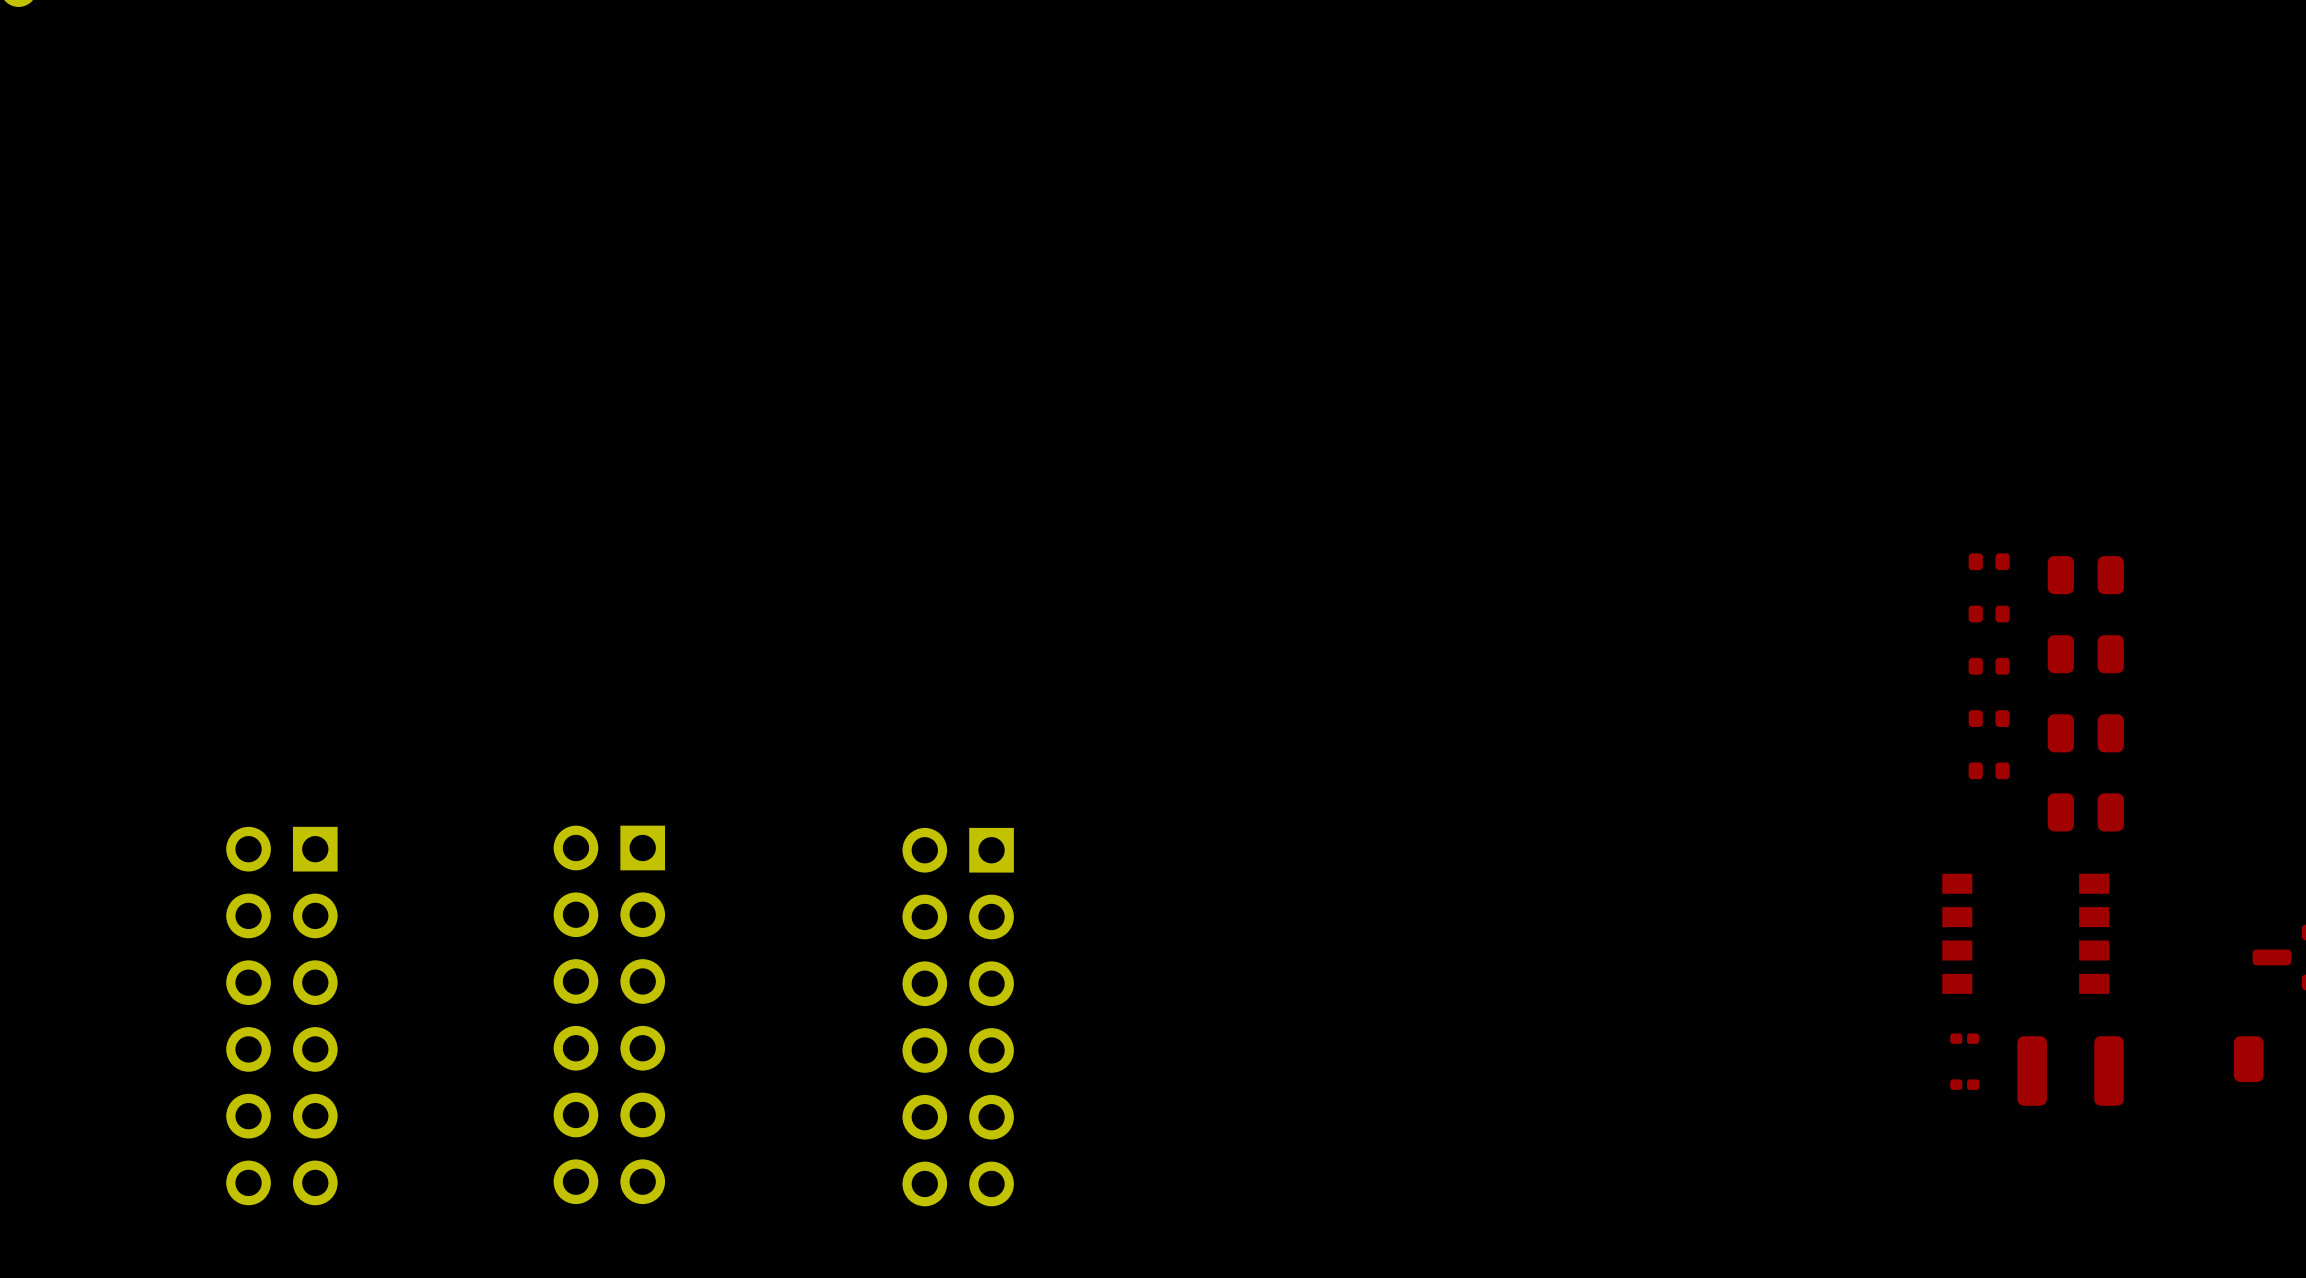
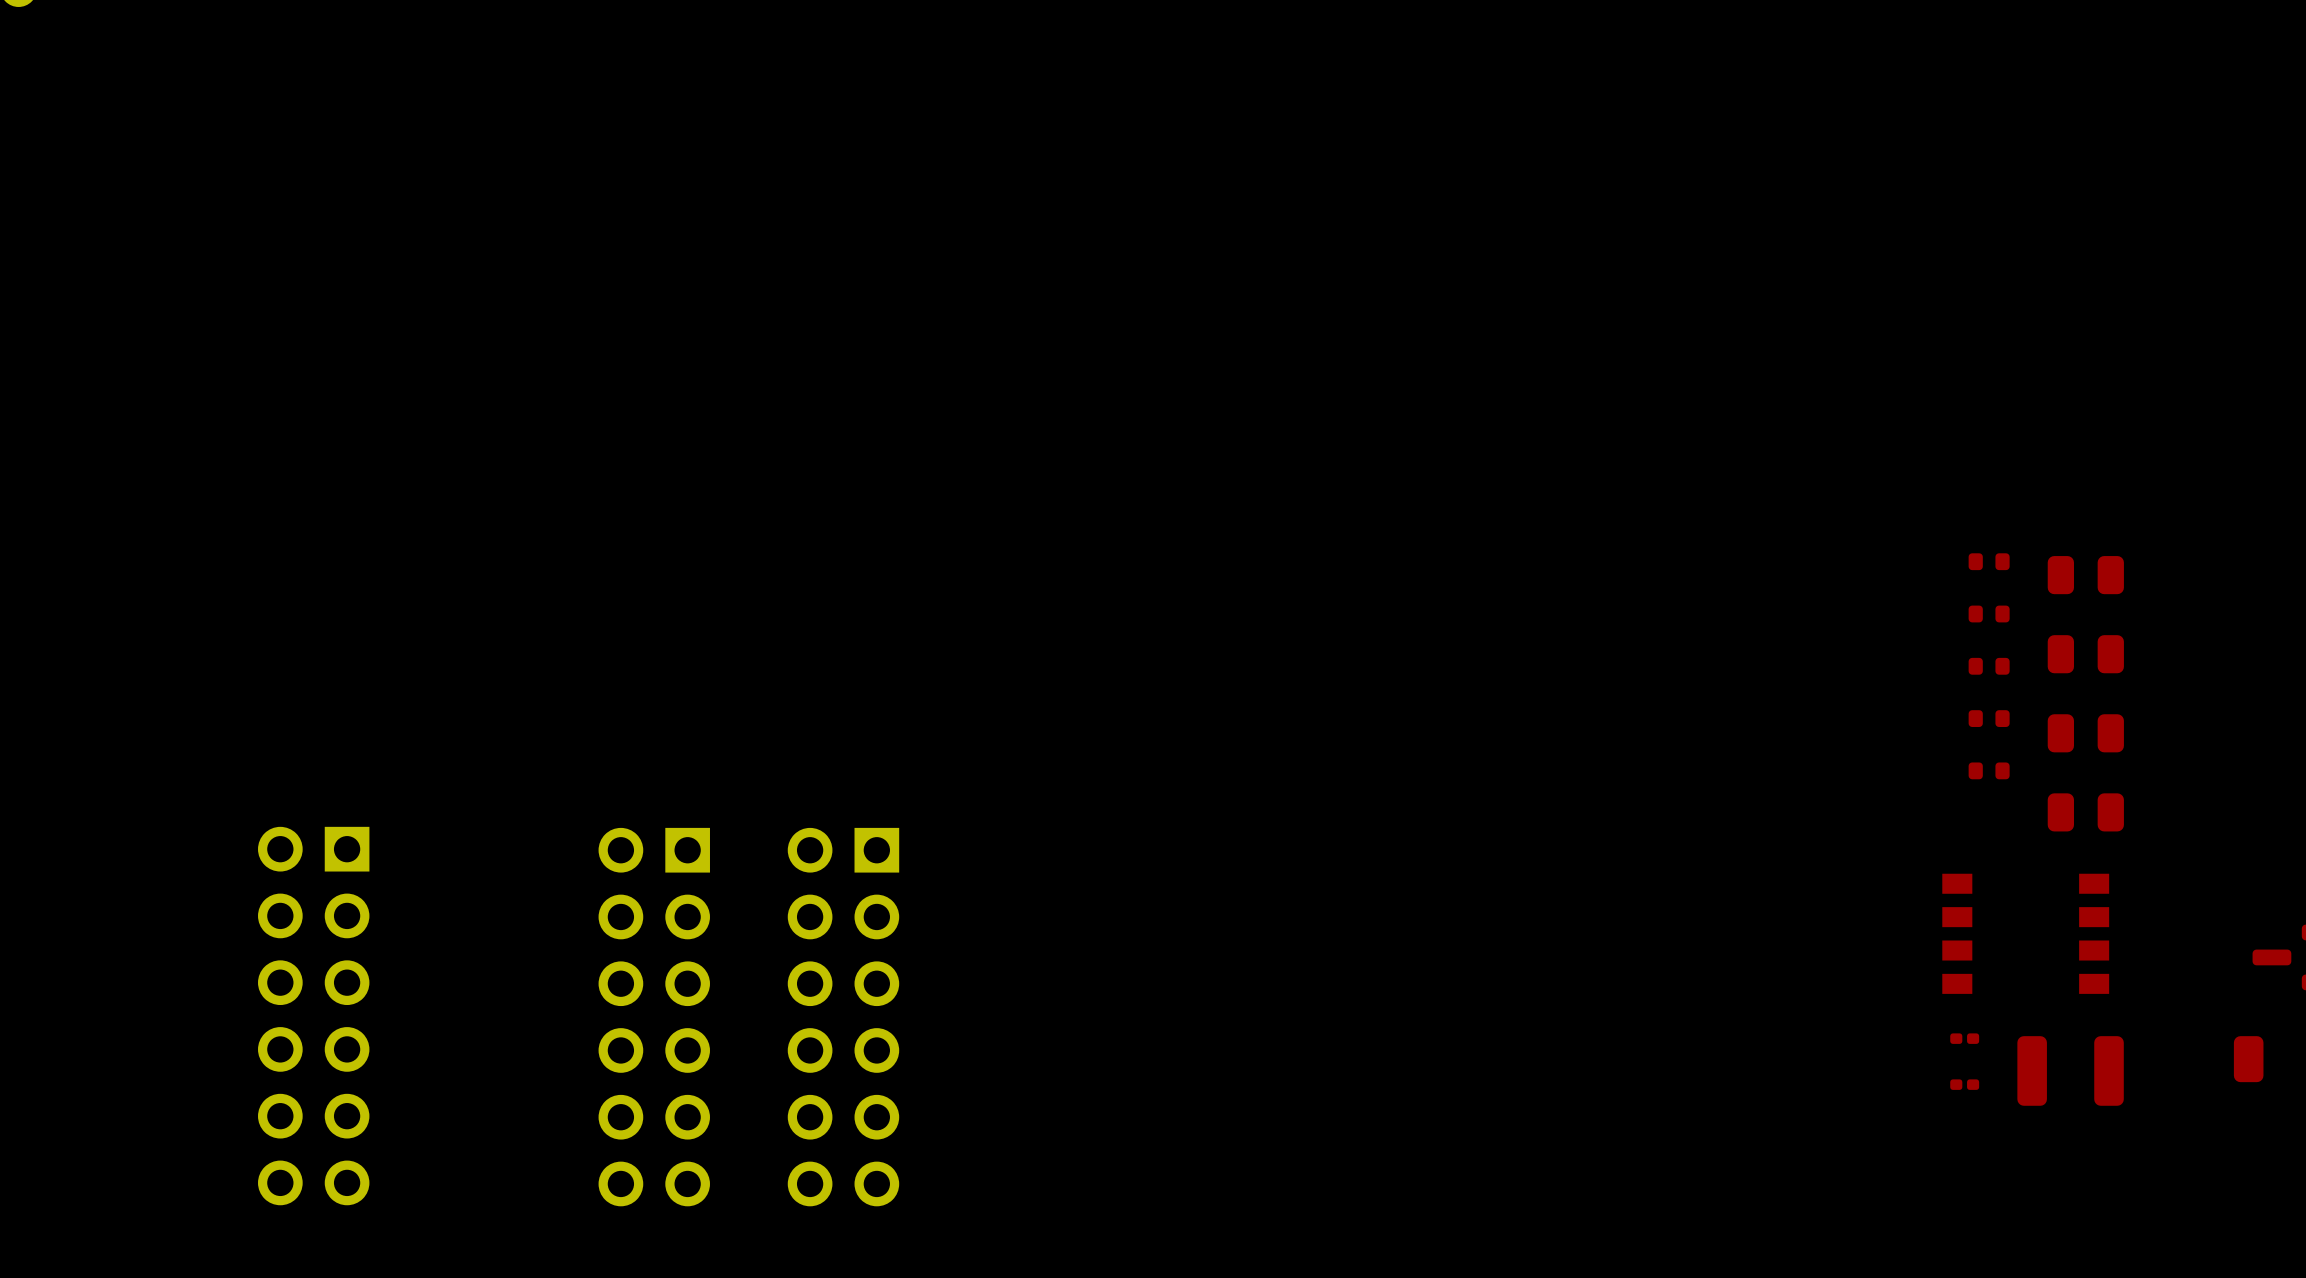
part position: (609, 1014) -> (654, 1017)
part position: (281, 1016) -> (313, 1016)
part position: (958, 1017) -> (843, 1017)

